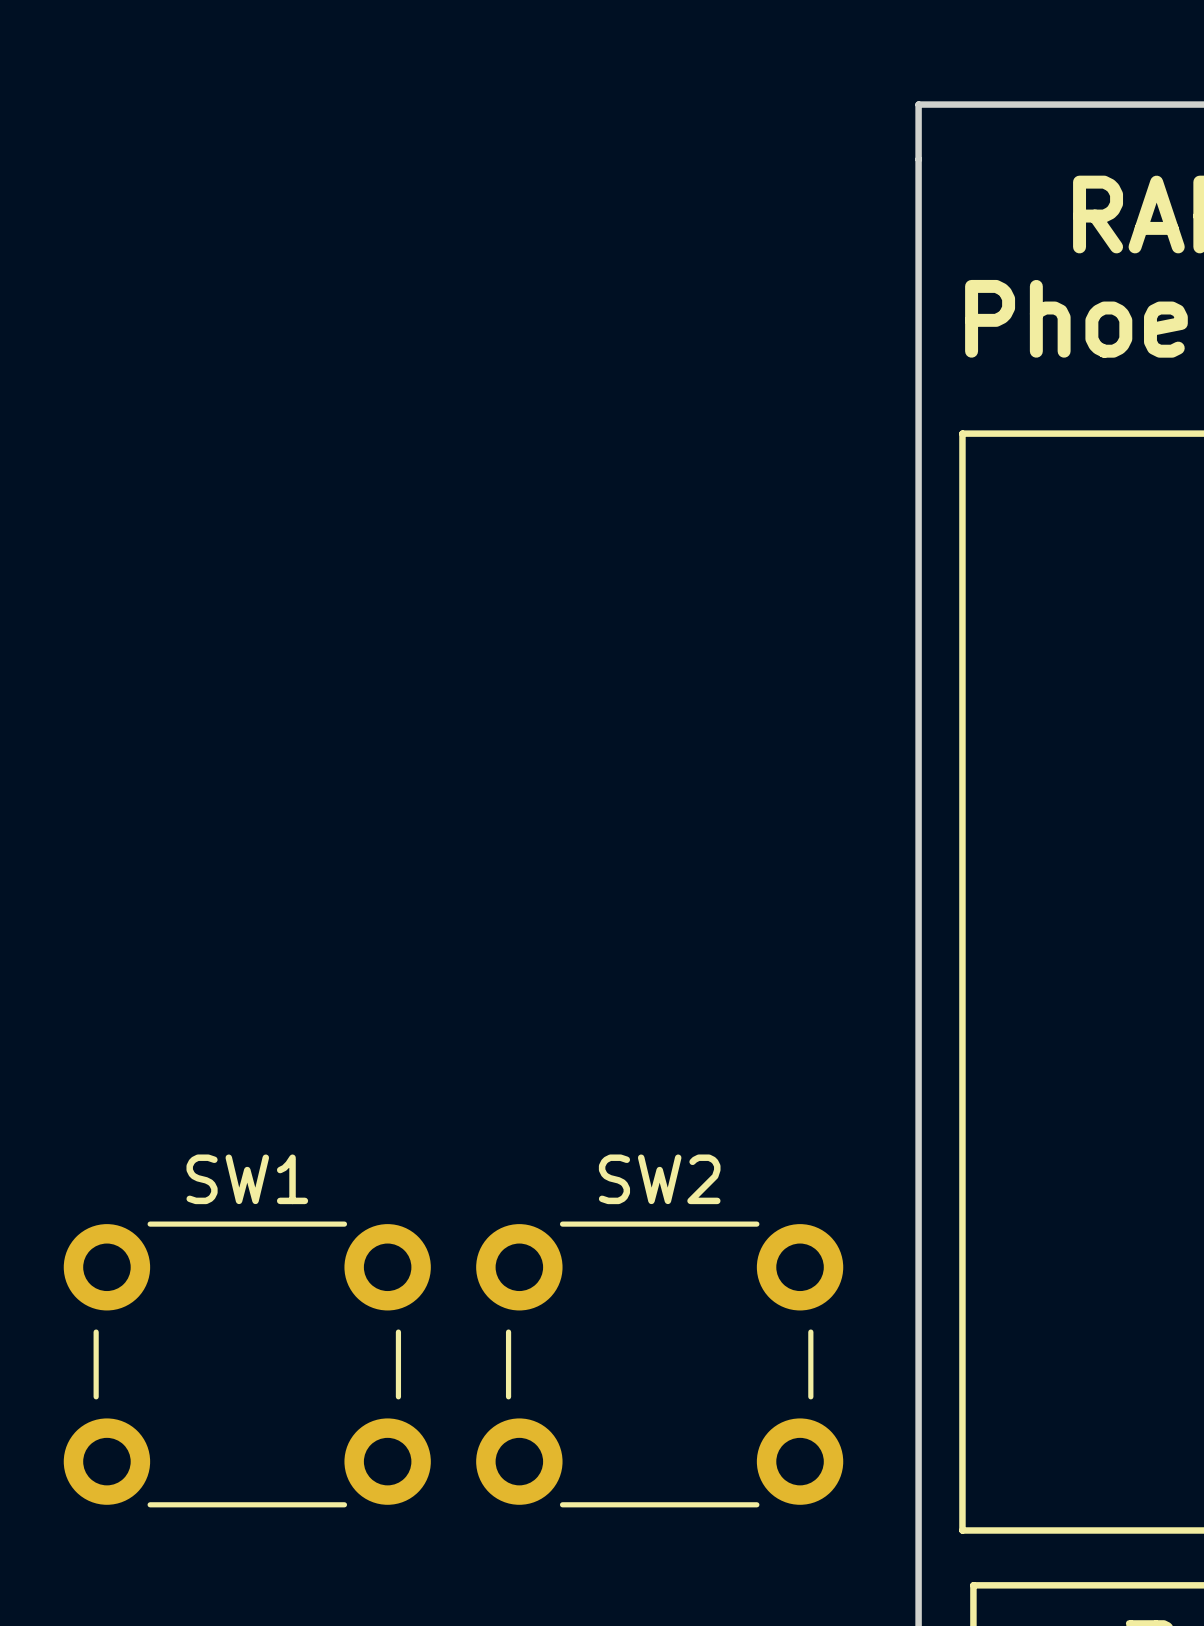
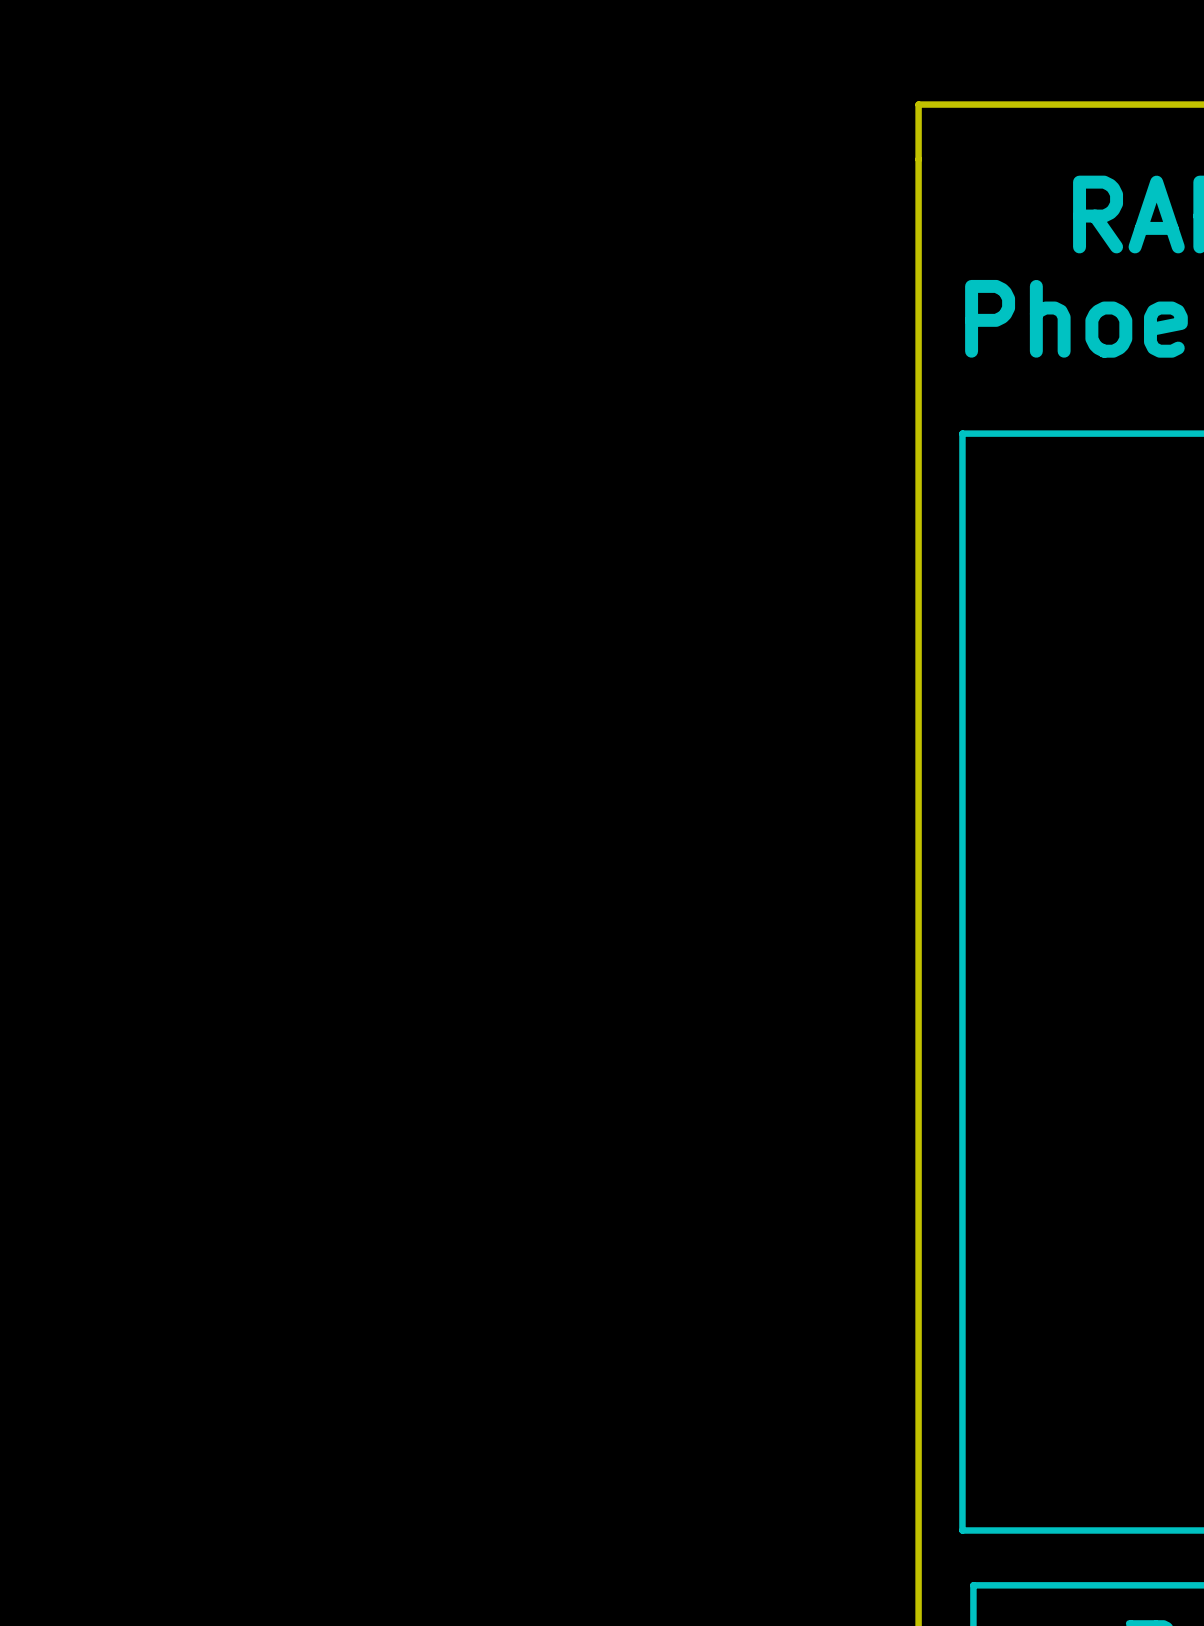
SW1: (247, 1364) -> none
SW2: (659, 1364) -> none

